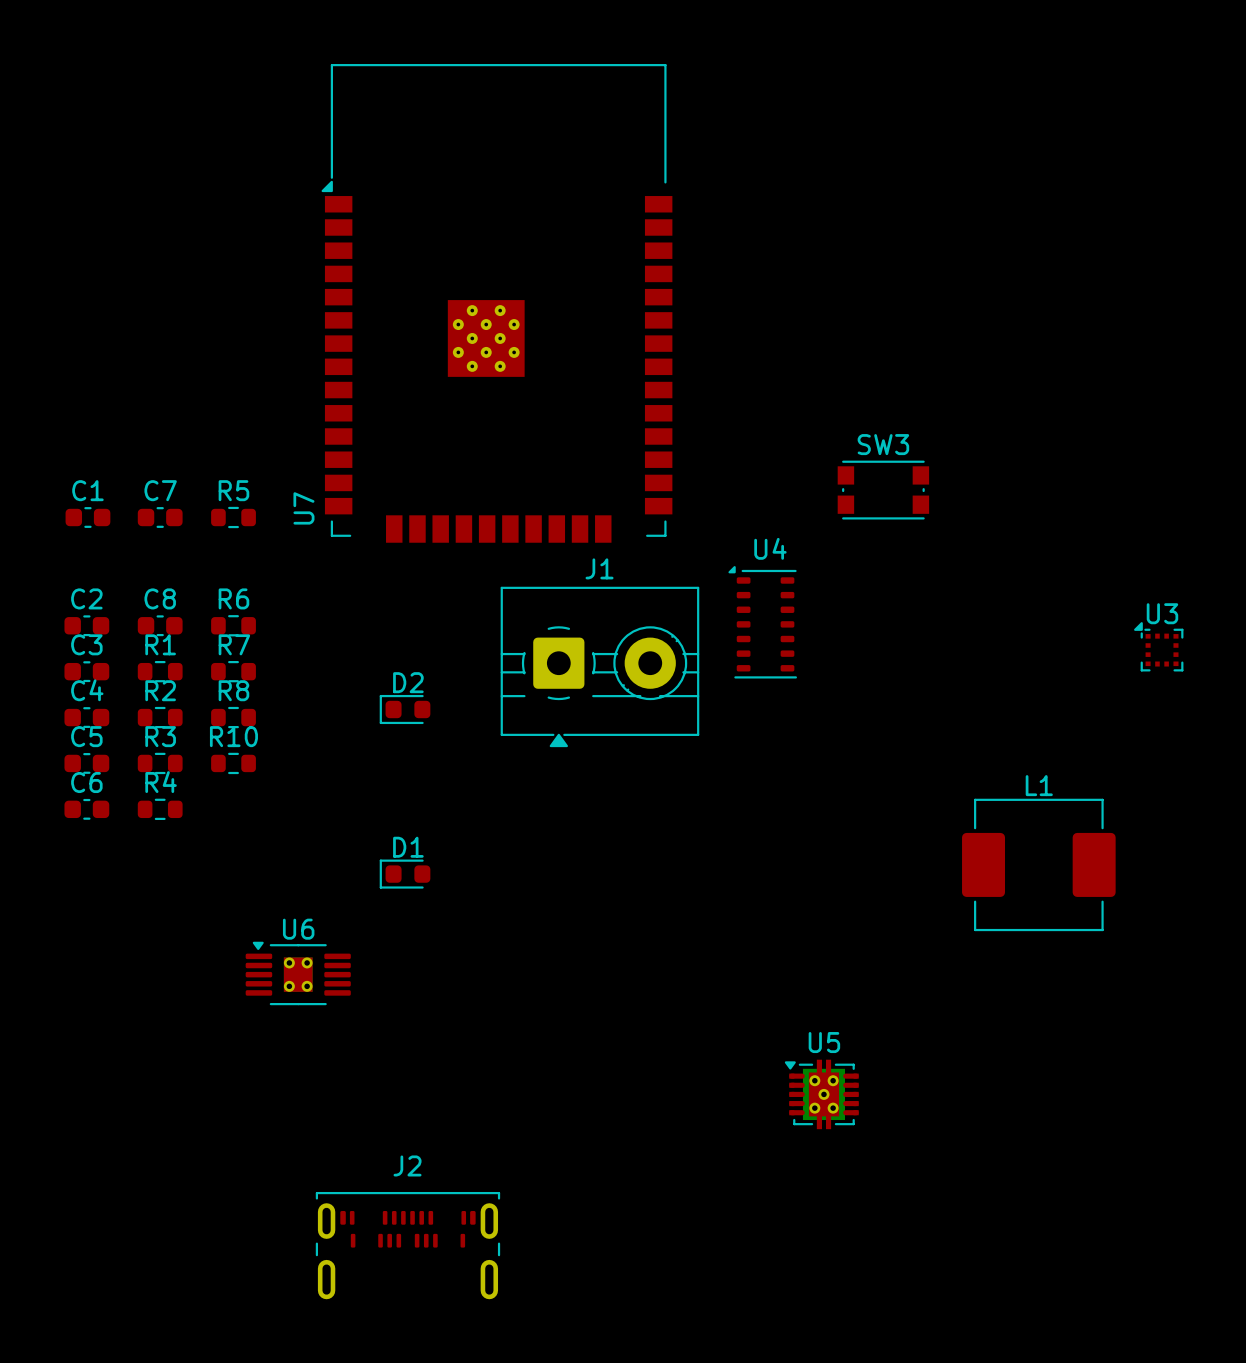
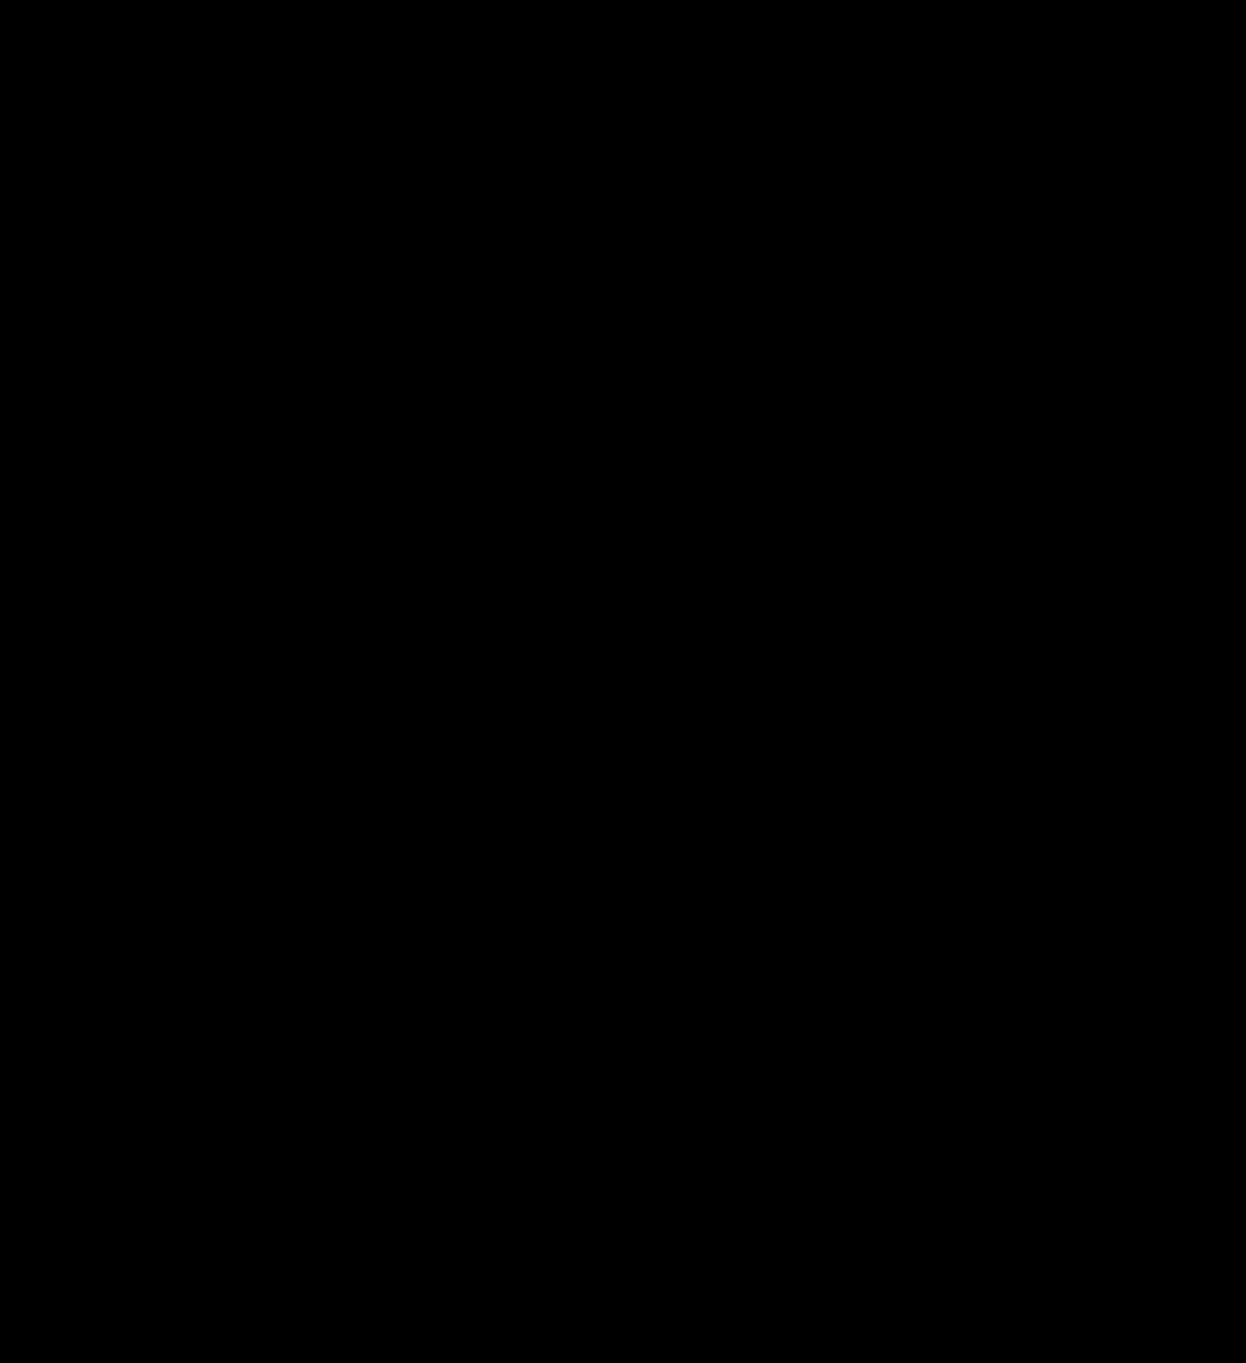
U7: (496, 303) -> none
SW3: (883, 490) -> none
C1: (87, 517) -> none
C7: (160, 517) -> none
R5: (233, 517) -> none
U4: (762, 622) -> none
C2: (86, 625) -> none
C8: (160, 625) -> none
R6: (233, 625) -> none
U3: (1158, 646) -> none
J1: (599, 666) -> none
C3: (86, 671) -> none
R1: (160, 671) -> none
R7: (233, 671) -> none
D2: (405, 709) -> none
C4: (86, 717) -> none
R2: (160, 717) -> none
R8: (233, 717) -> none
C5: (86, 763) -> none
R3: (160, 763) -> none
R10: (233, 763) -> none
C6: (86, 809) -> none
R4: (160, 809) -> none
L1: (1038, 864) -> none
D1: (405, 874) -> none
U6: (298, 973) -> none
U5: (821, 1094) -> none
J2: (407, 1245) -> none

